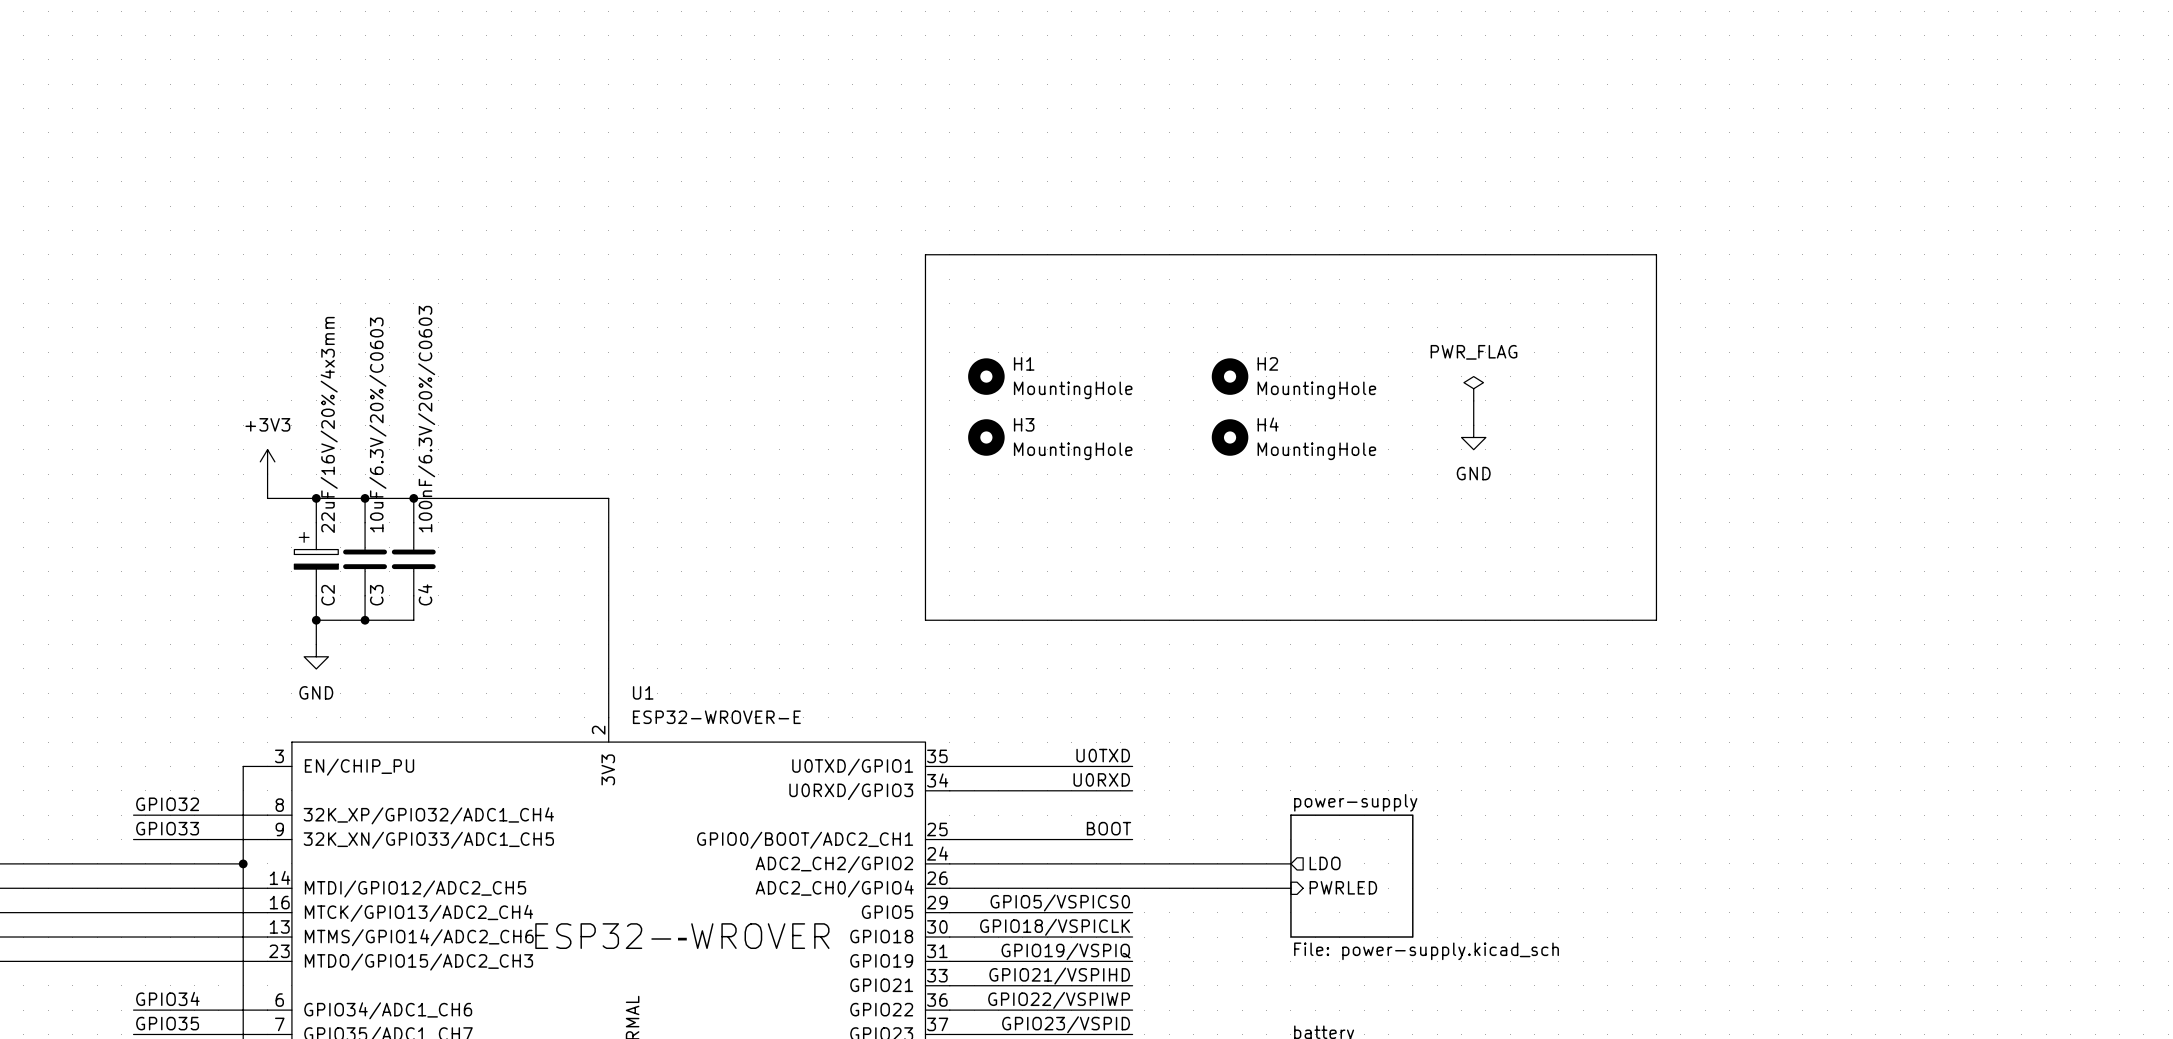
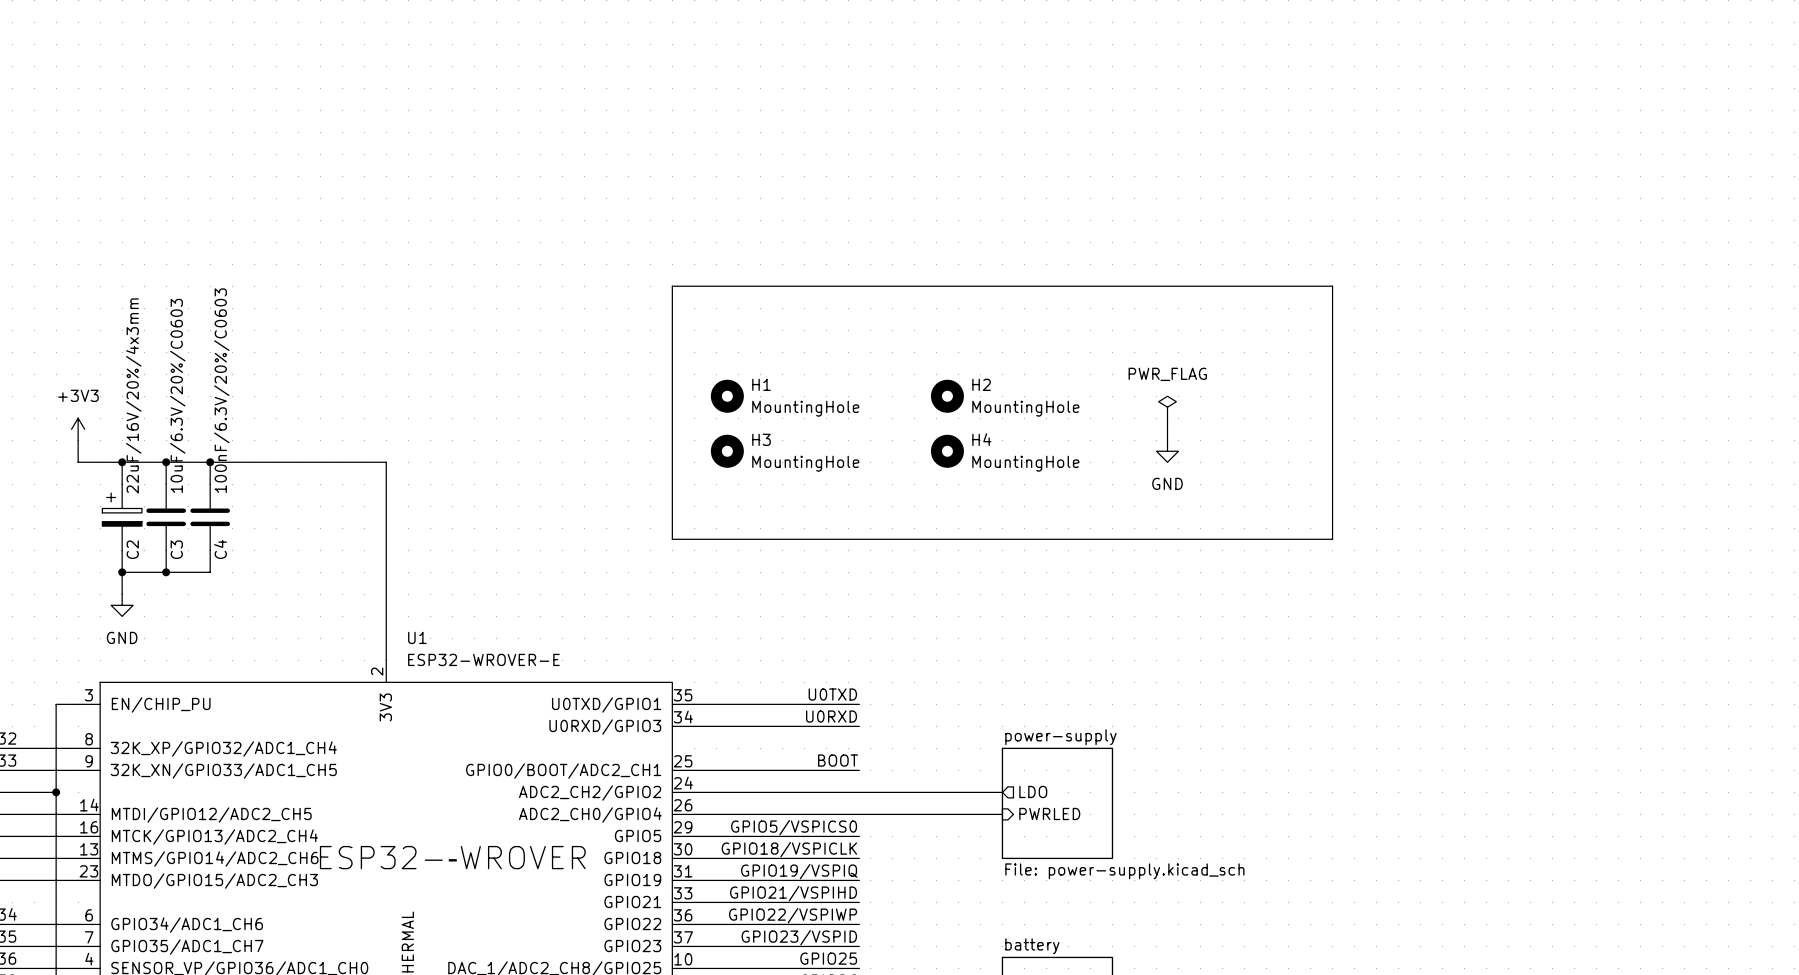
line: (925, 303) (925, 254) (1656, 254) (1656, 303) -> (672, 286) (1332, 286)
H1 position: (986, 376) -> (727, 396)
H2 position: (1230, 376) -> (947, 396)
power symbol: PWR_FLAG (1473, 388) -> none
wire: (1473, 400) (1473, 425) -> (1167, 418) (1167, 440)
H3 position: (986, 437) -> (727, 451)
H4 position: (1230, 437) -> (947, 451)
power symbol: GND (1473, 437) -> PWR_FLAG (1167, 407)
power symbol: none -> GND (1167, 451)
line: (925, 583) (925, 620) (1656, 620) (1656, 583) -> (672, 539) (1332, 539)

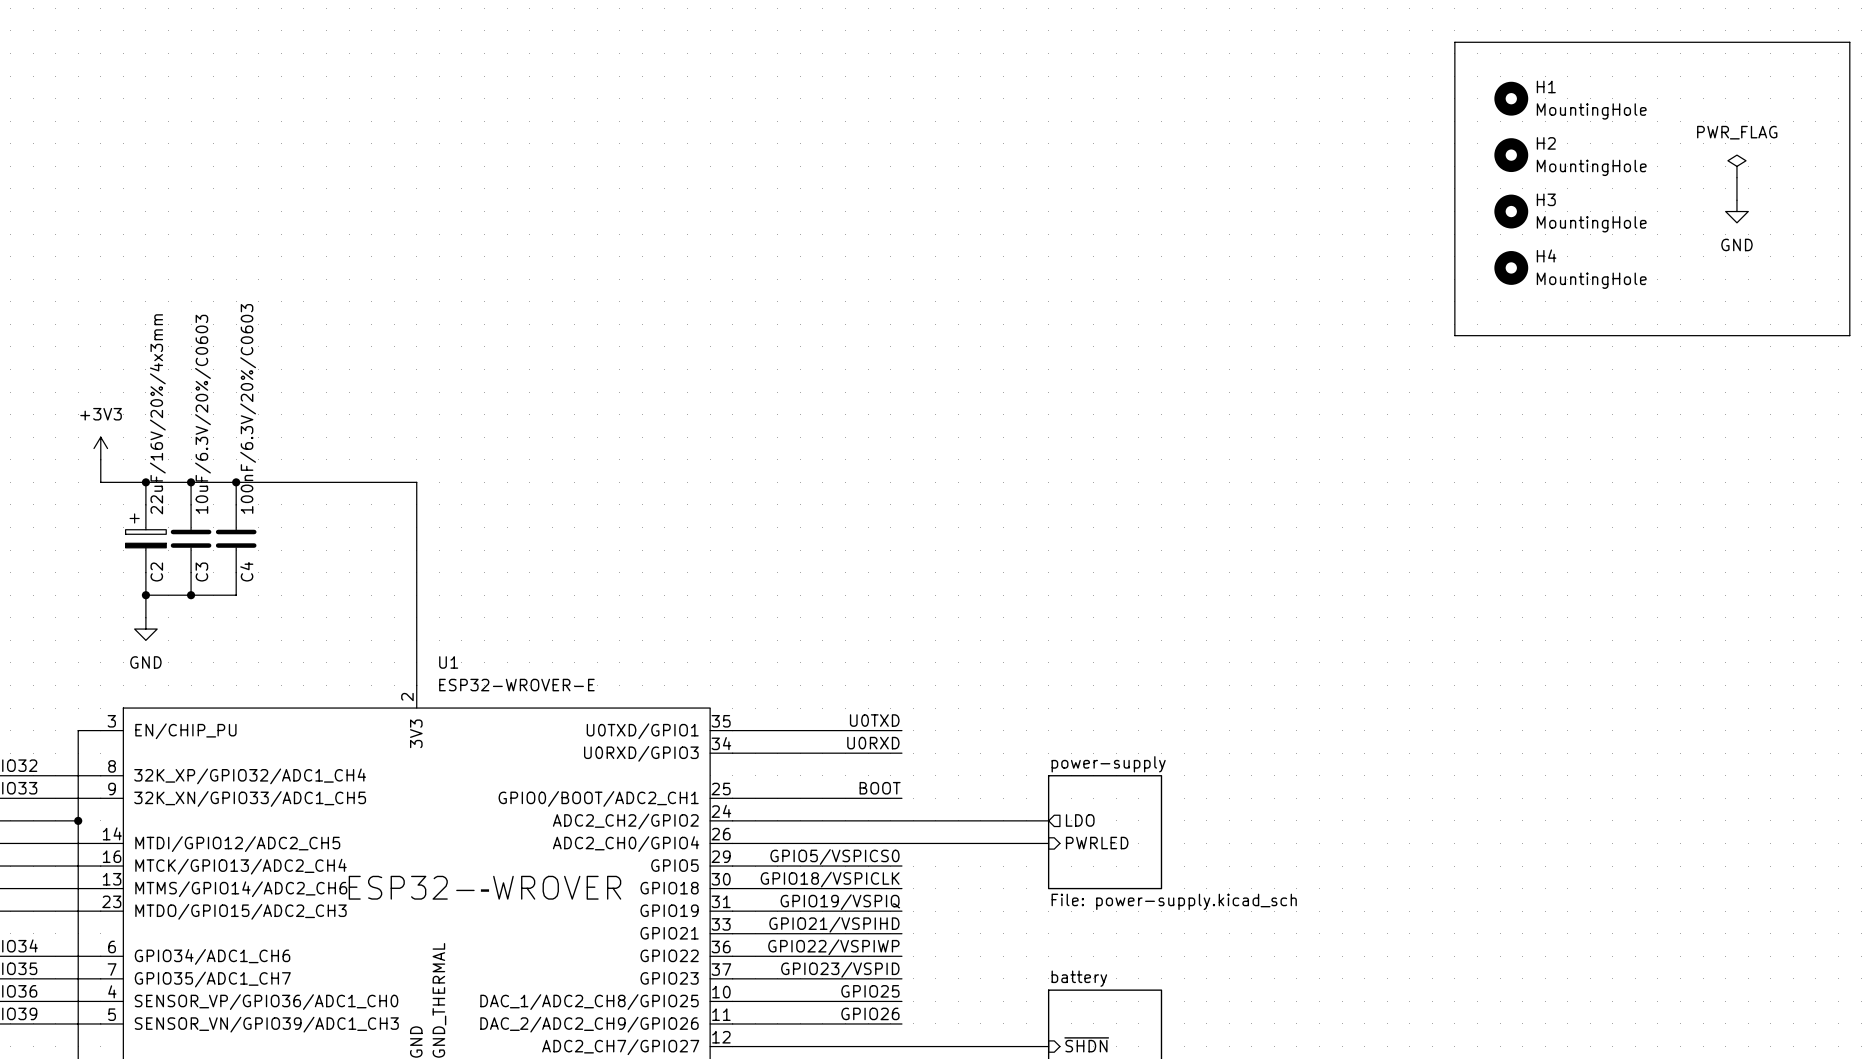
line: none -> (1454, 42) (1849, 42) (1849, 335) (1454, 335) (1454, 42)
power symbol: none -> PWR_FLAG (1736, 166)
wire: none -> (1736, 177) (1736, 200)
power symbol: none -> GND (1736, 211)
line: (672, 286) (672, 539) (1332, 539) (1332, 286) (672, 286) -> none
H1 position: (727, 396) -> (1511, 98)
H2 position: (947, 396) -> (1511, 155)
power symbol: PWR_FLAG (1167, 407) -> none
wire: (1167, 418) (1167, 440) -> none
H3 position: (727, 451) -> (1511, 211)
H4 position: (947, 451) -> (1511, 267)
power symbol: GND (1167, 451) -> none

